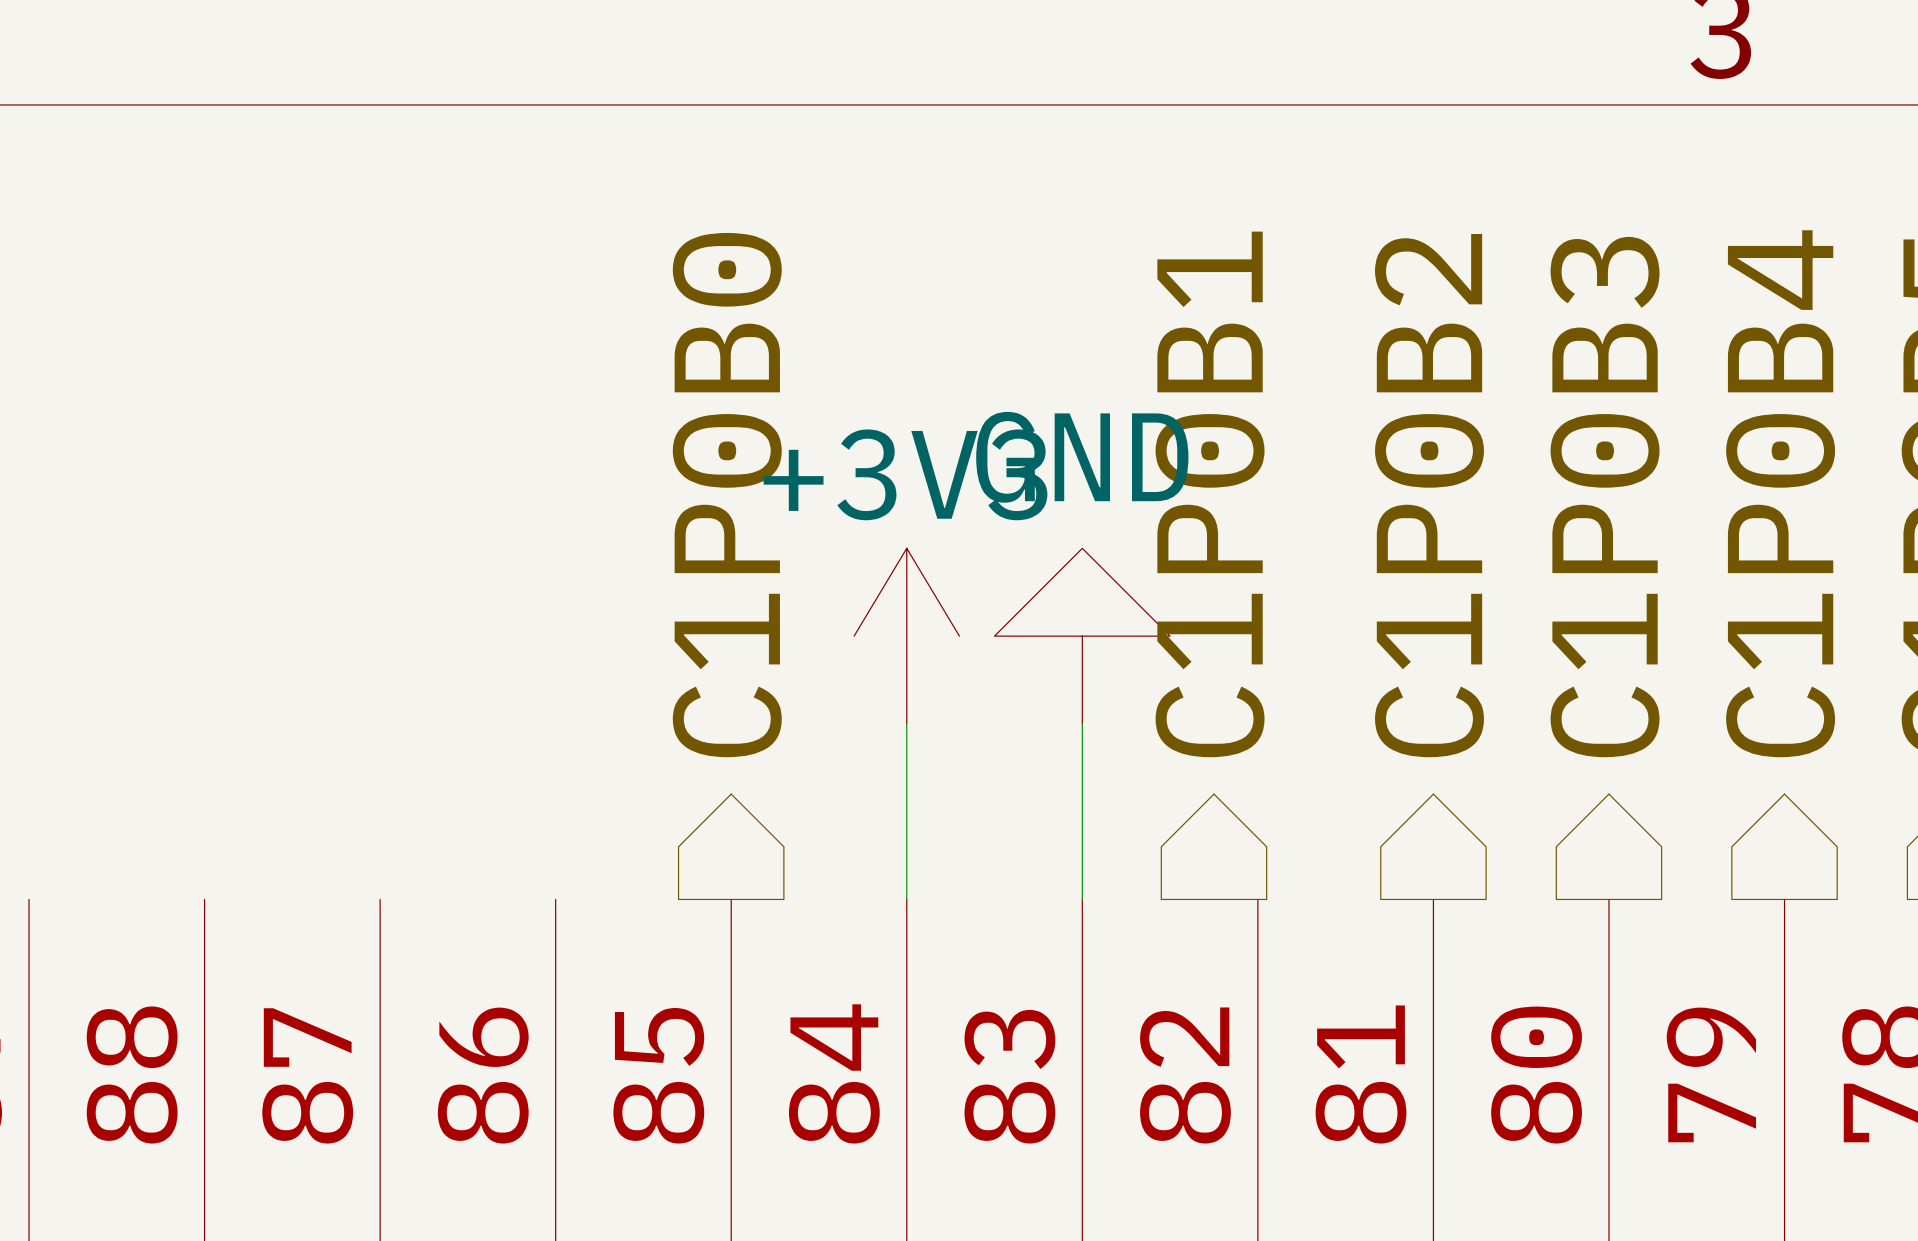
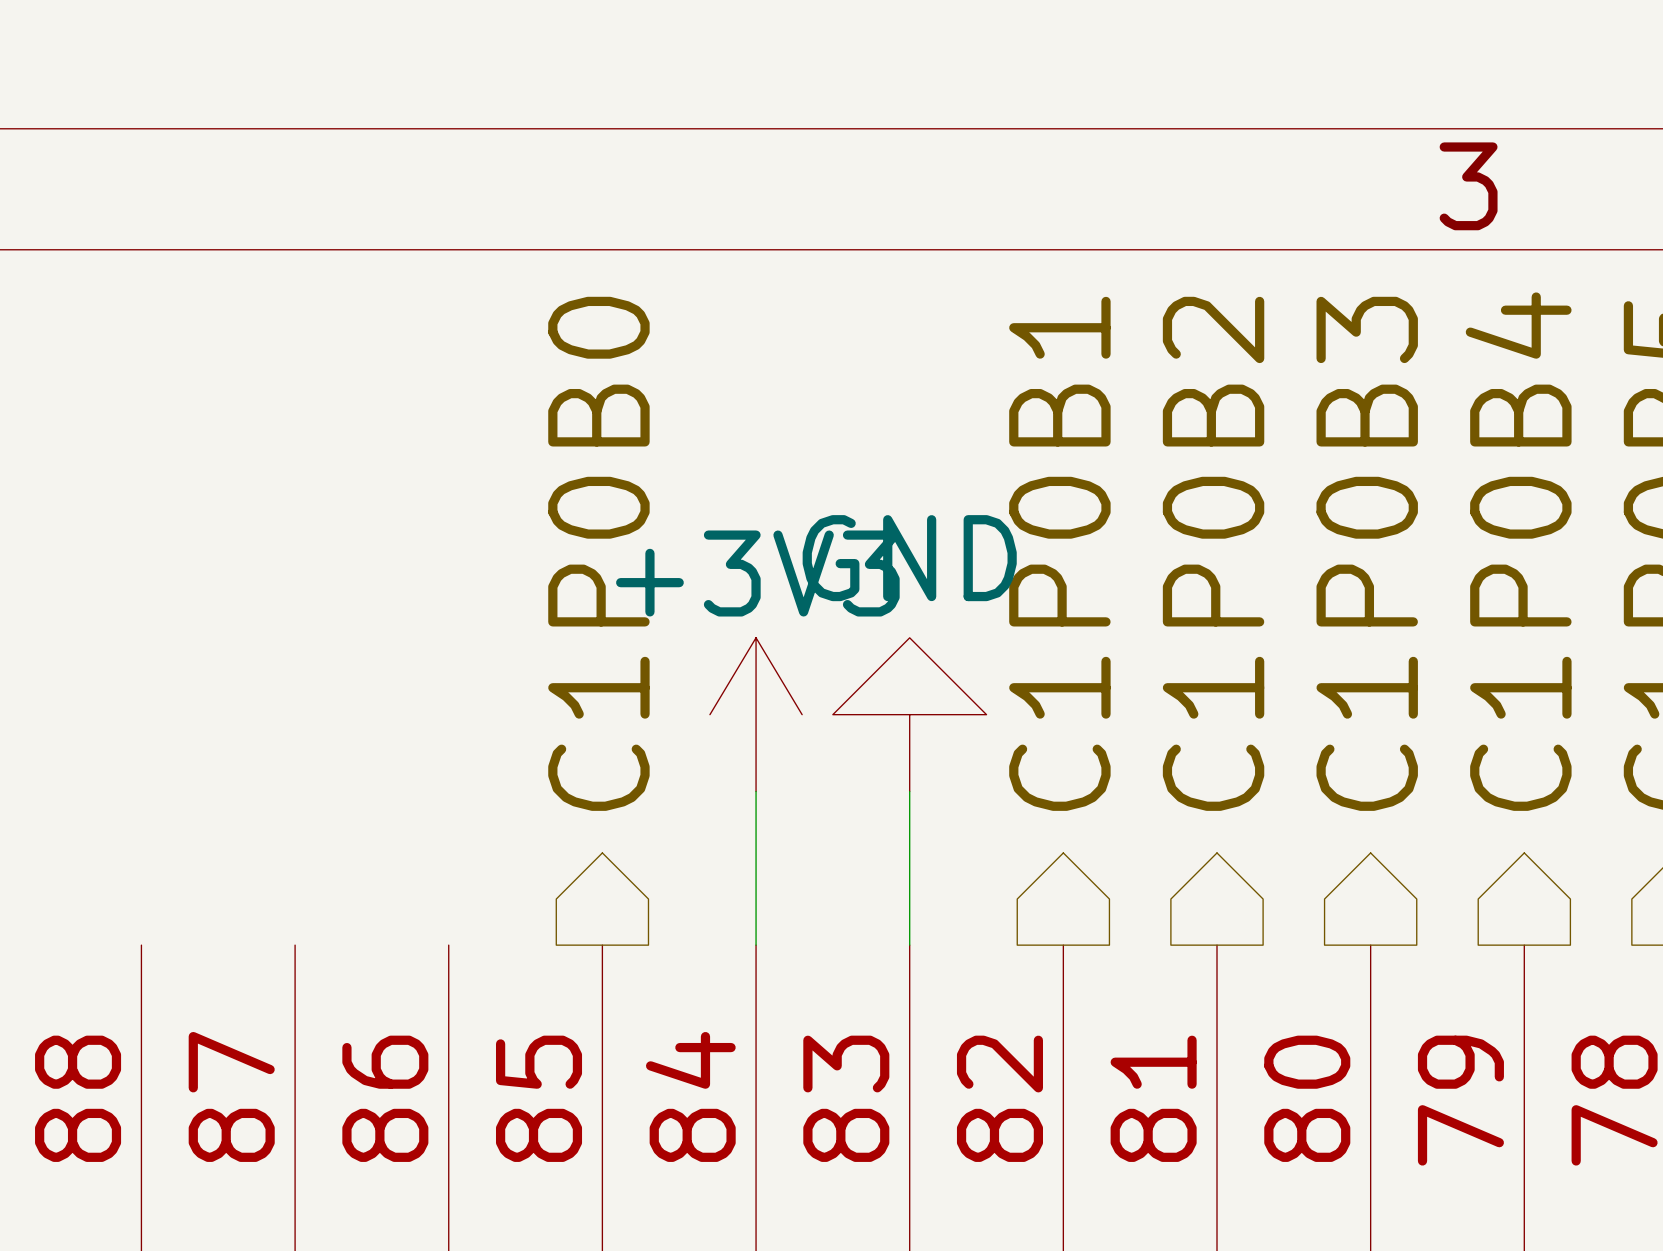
hierarchical label position: C1P0B1 (1210, 494) -> C1P0B1 (1059, 553)

